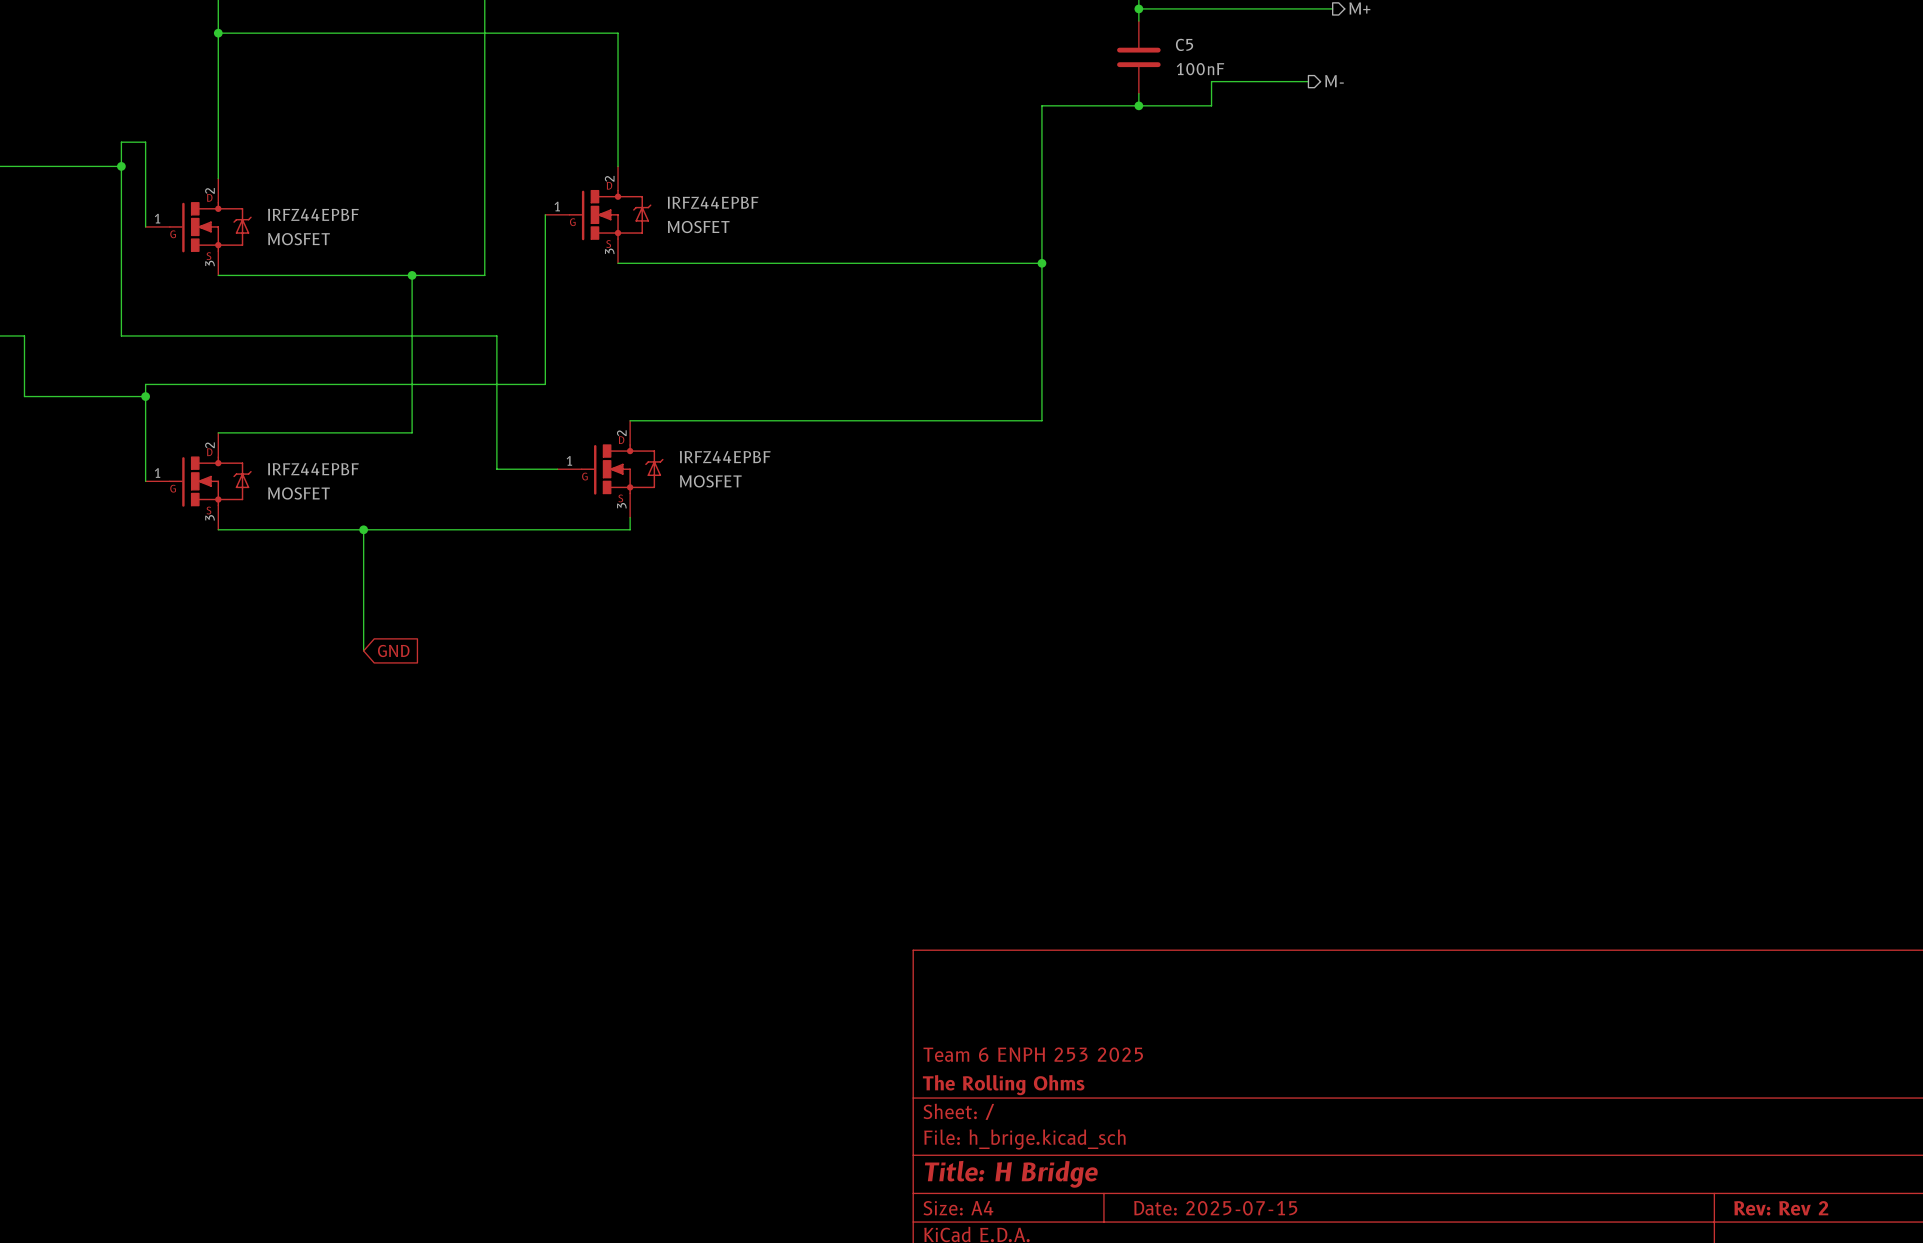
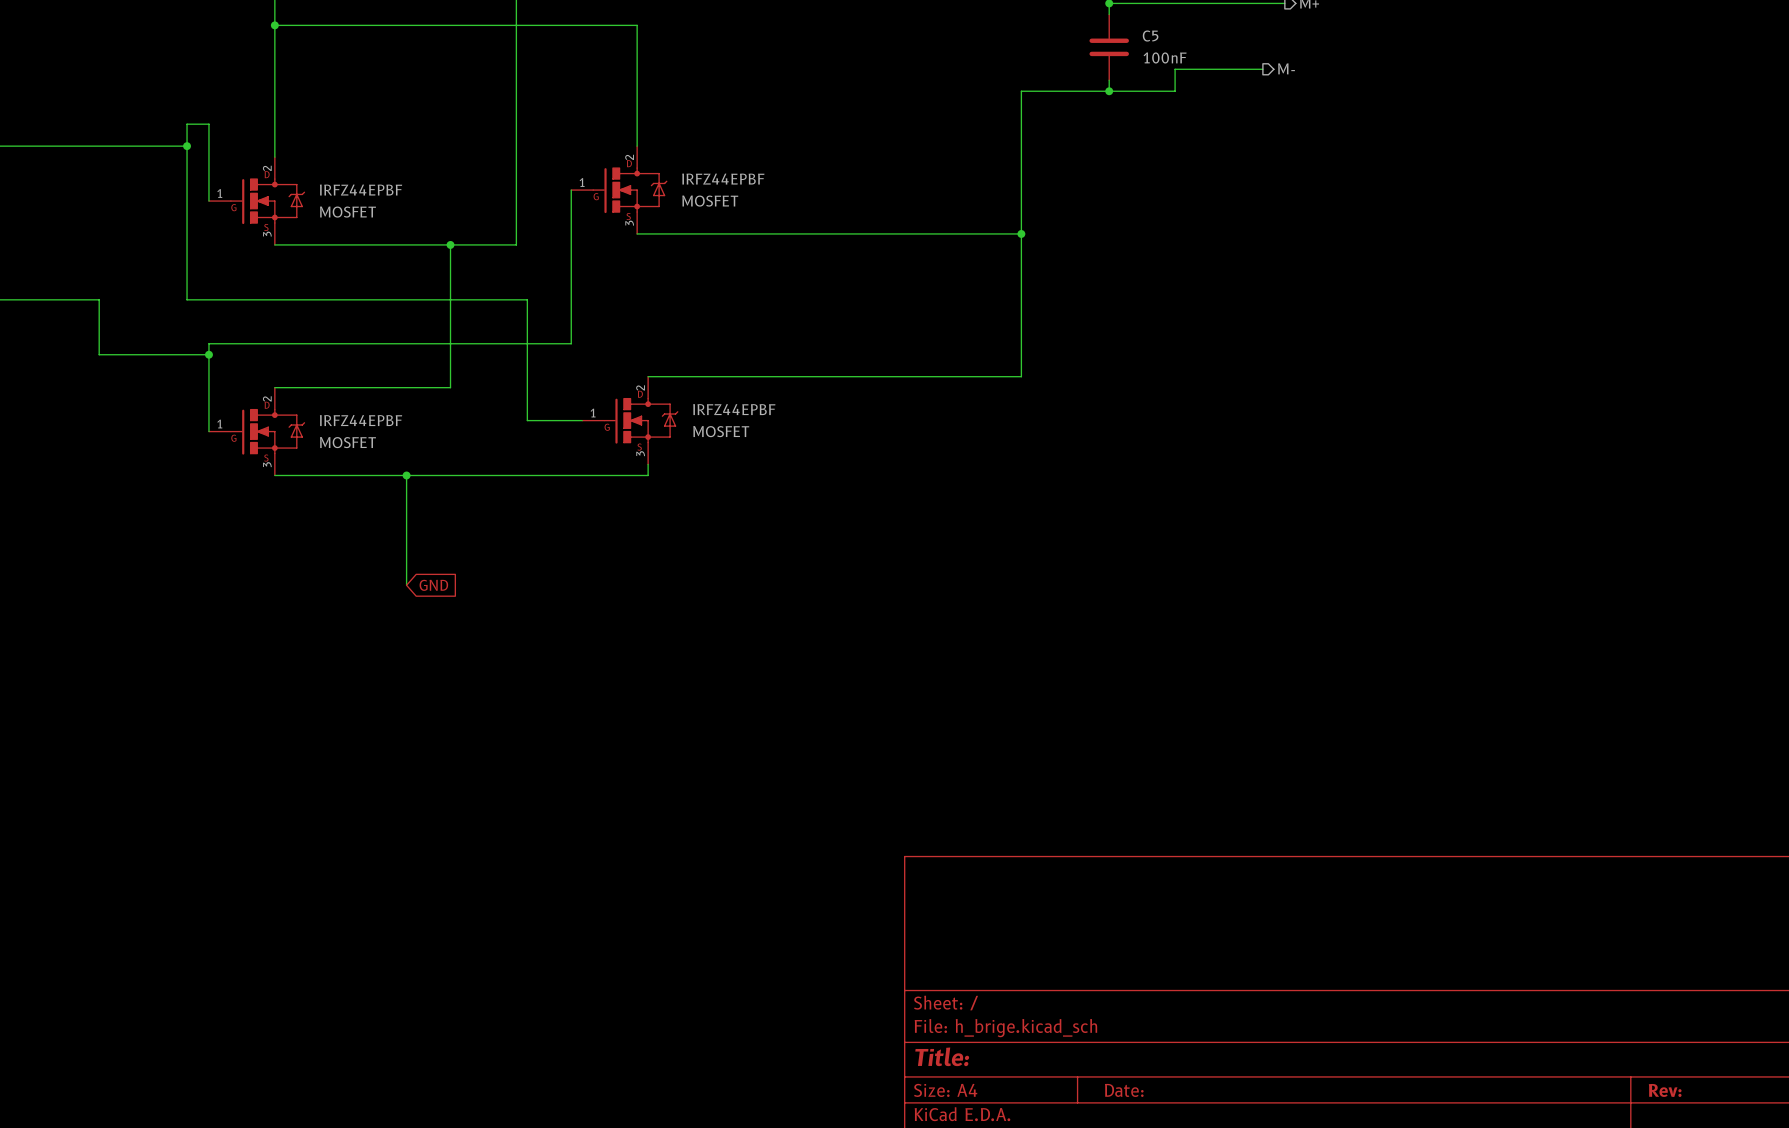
title block: Team 6 ENPH 253 2025 (1033, 1054) -> none
title block: The Rolling Ohms (1003, 1085) -> none
title block: Title: H Bridge (1011, 1174) -> Title: (942, 1056)
title block: Date: 2025-07-15 (1215, 1208) -> Date: (1124, 1090)
title block: Rev: Rev 2 (1781, 1208) -> Rev: (1665, 1090)

